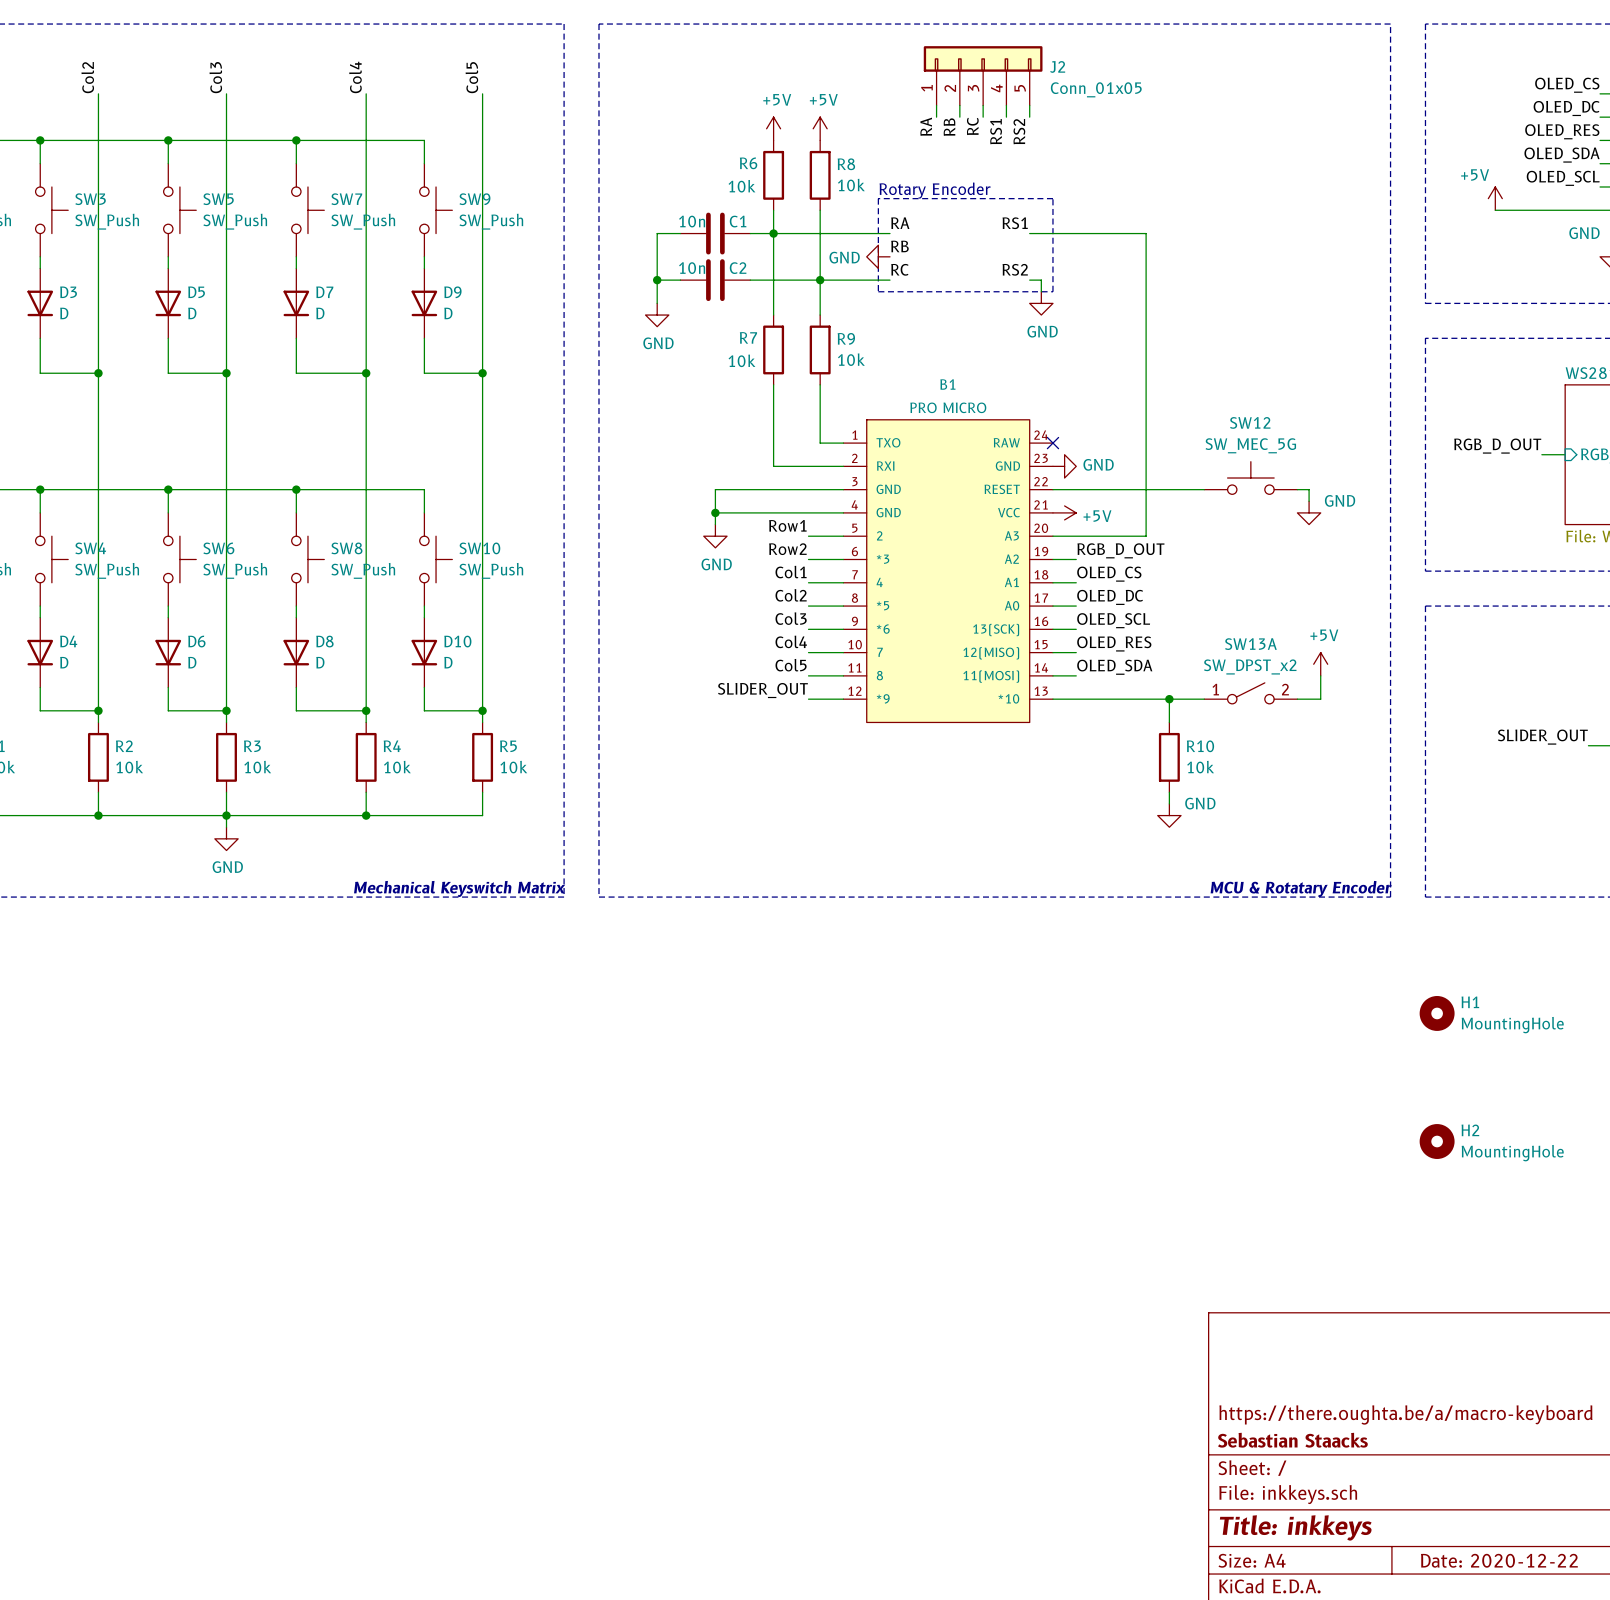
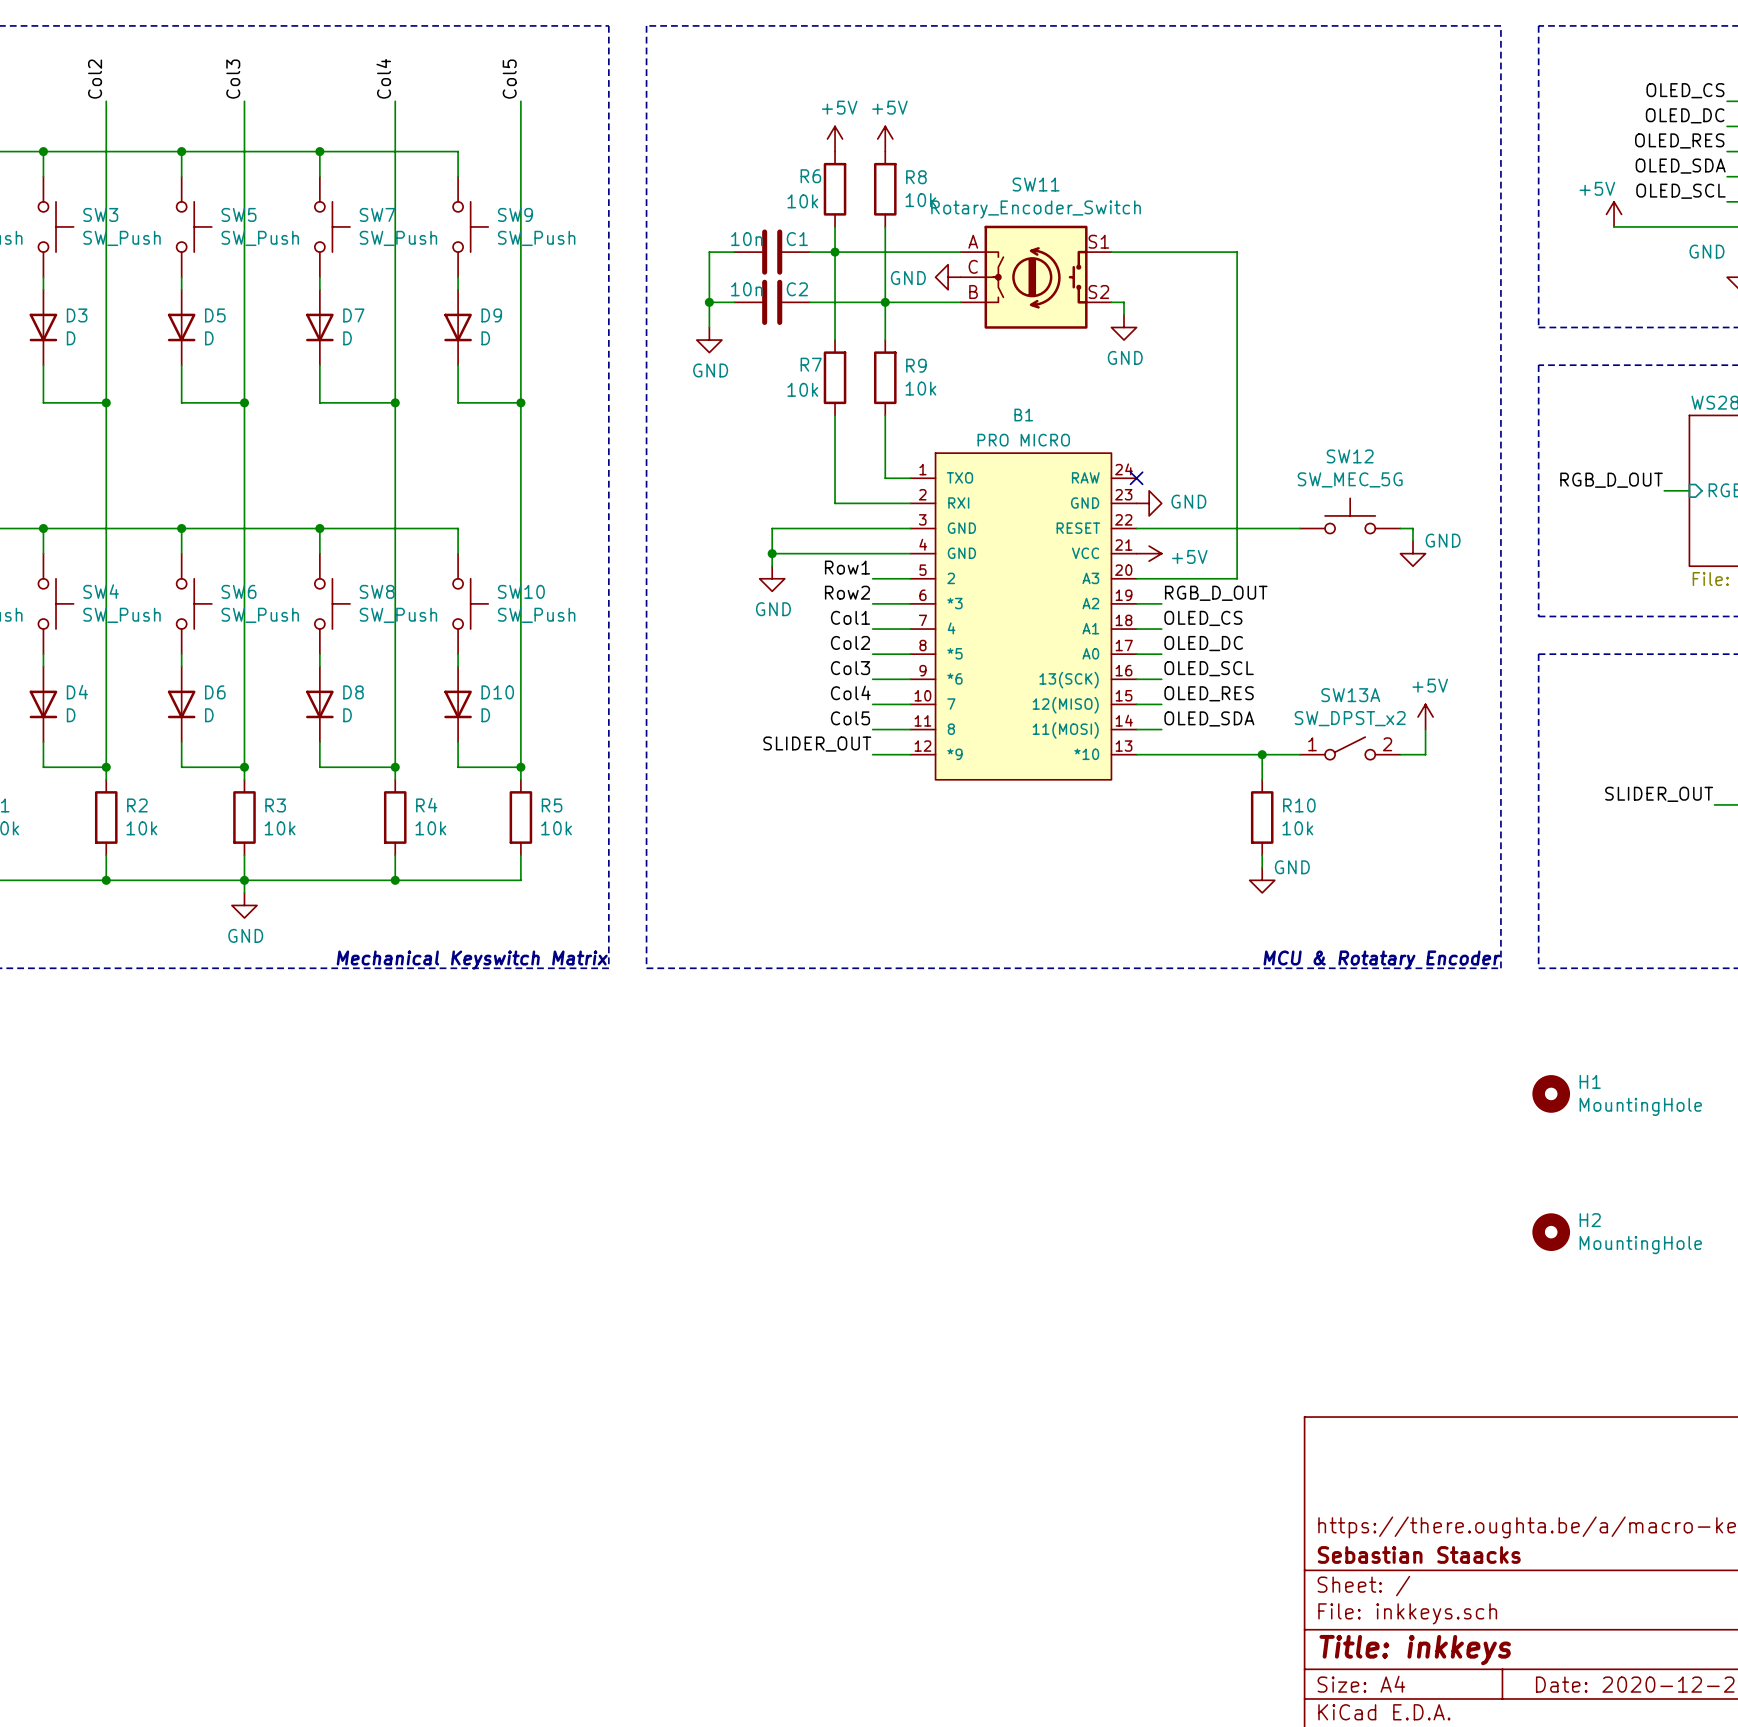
J2: Conn_01x05 (983, 75) -> none
wire: (936, 105) (936, 117) -> none
wire: (959, 105) (959, 117) -> none
wire: (983, 105) (983, 117) -> none
wire: (1006, 105) (1006, 117) -> none
wire: (1029, 105) (1029, 117) -> none
label: RA (926, 126) -> none
label: RC (972, 126) -> none
label: RB (949, 127) -> none
label: RS1 (996, 131) -> none
label: RS2 (1019, 131) -> none
text: Rotary Encoder (935, 190) -> none
line: (878, 198) (878, 291) (1052, 291) (1052, 198) (878, 198) -> none
label: RA (900, 223) -> none
label: RS1 (1015, 223) -> none
label: RB (899, 246) -> none
SW11: none -> Rotary_Encoder_Switch (1036, 277)
label: RC (899, 269) -> none
label: RS2 (1015, 269) -> none

